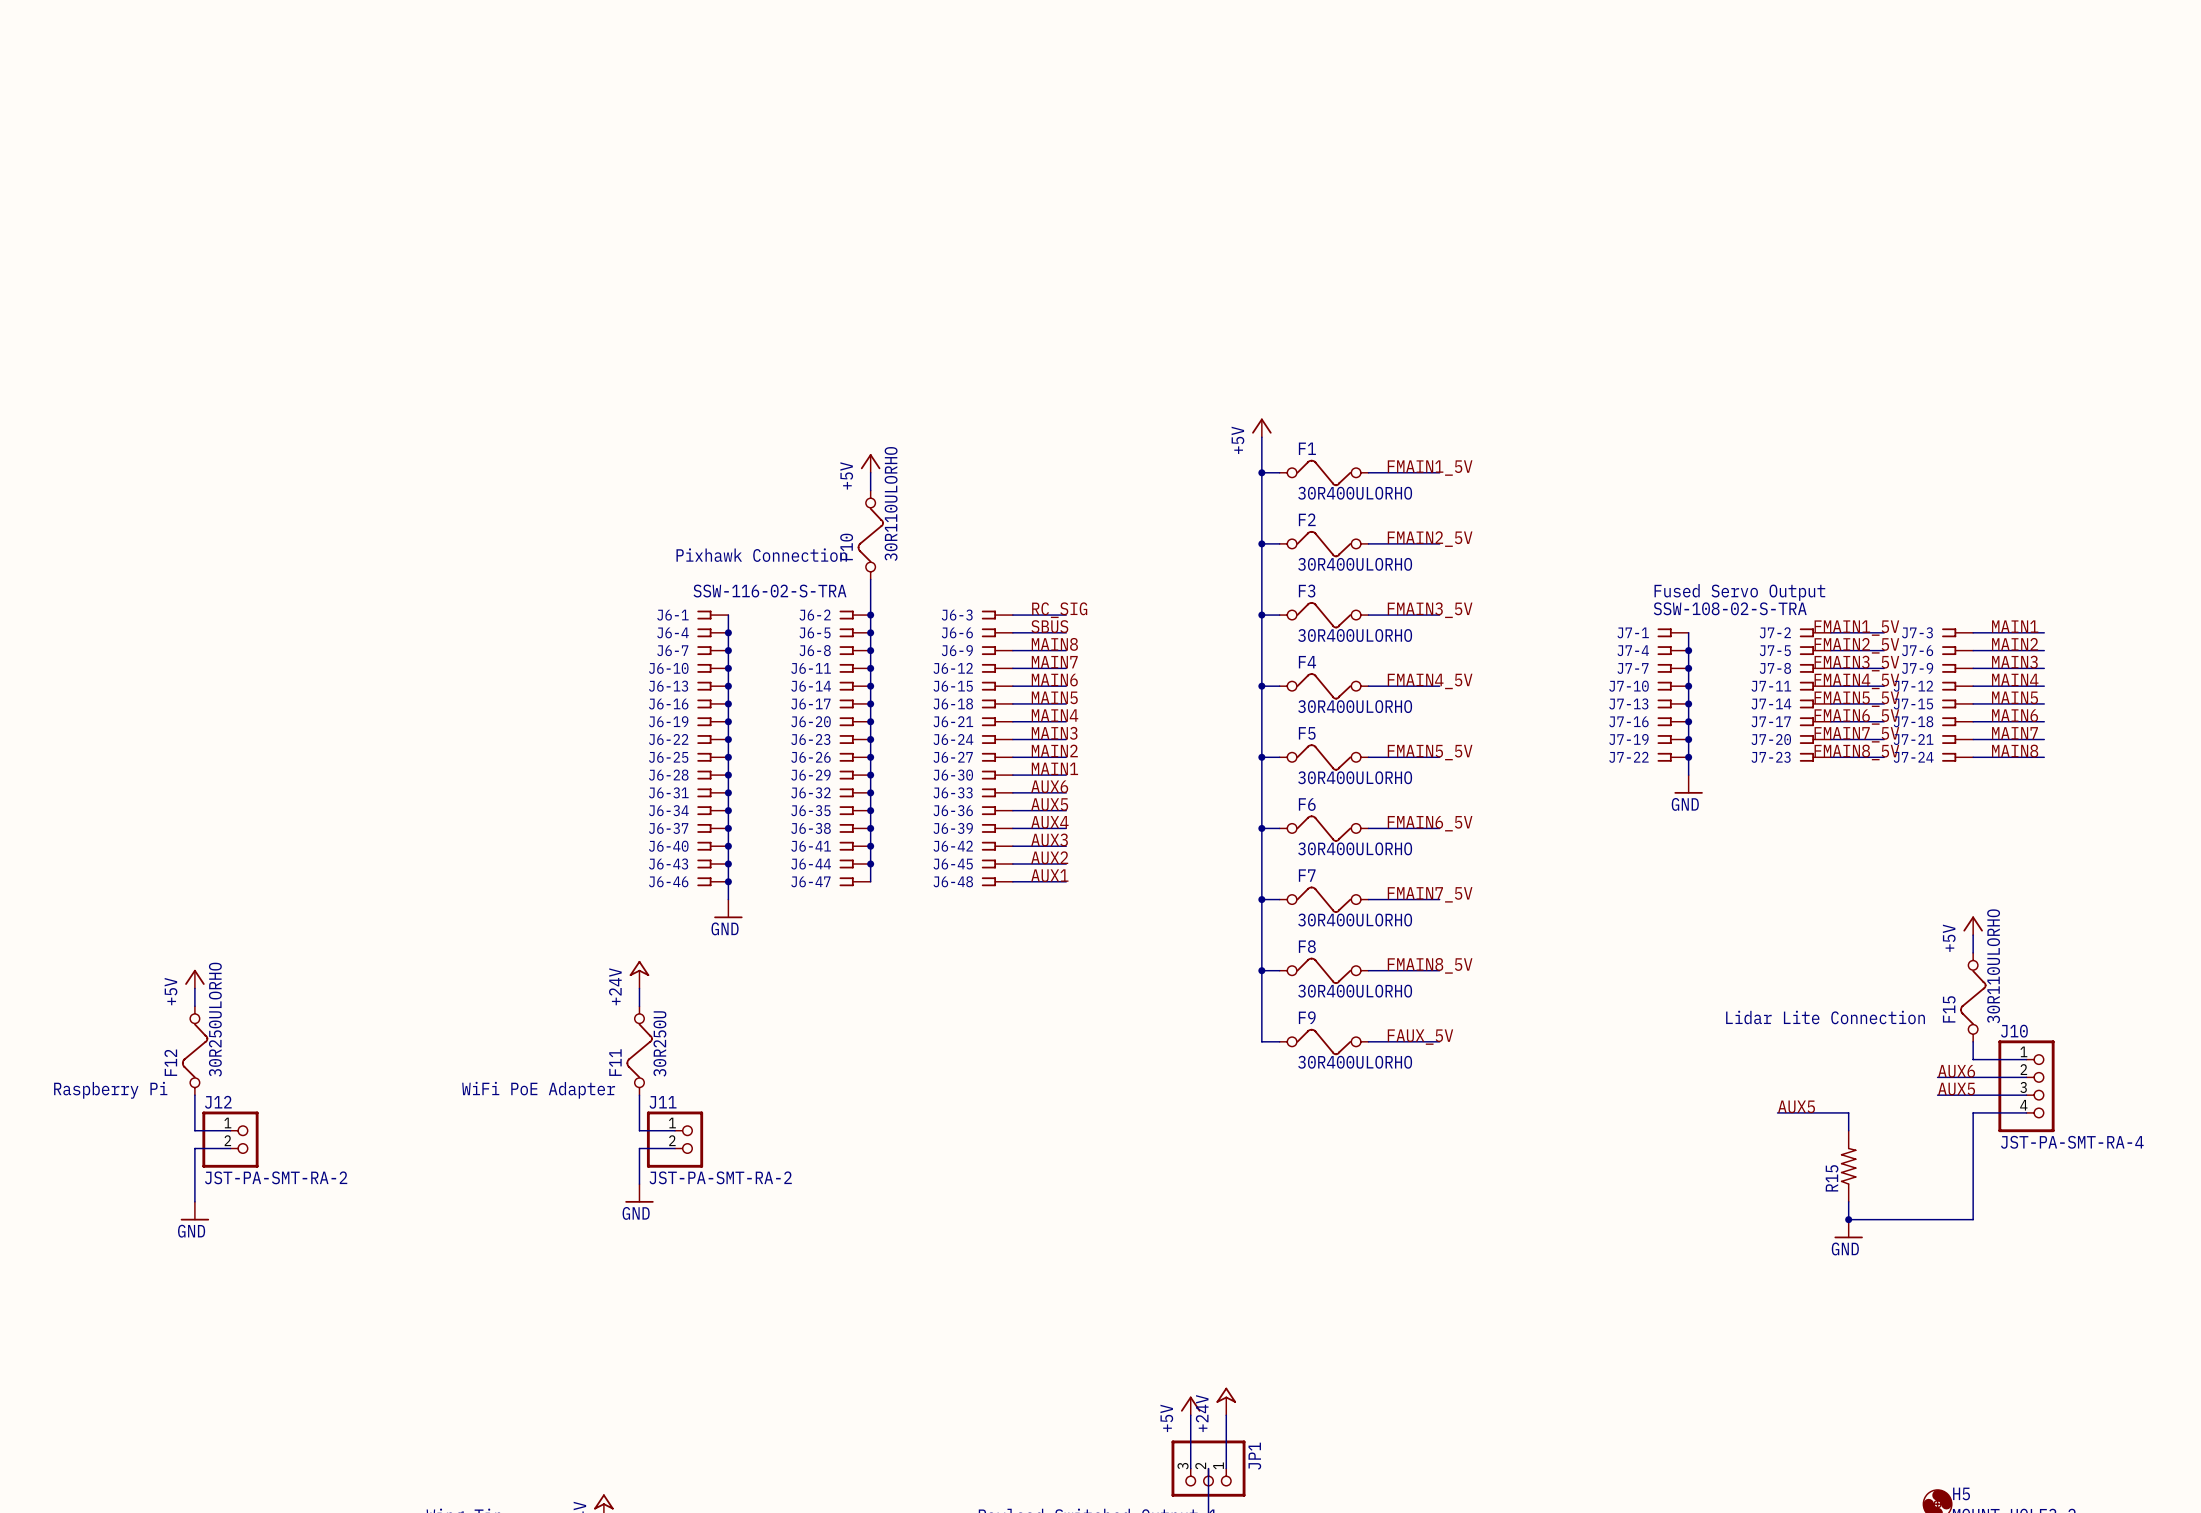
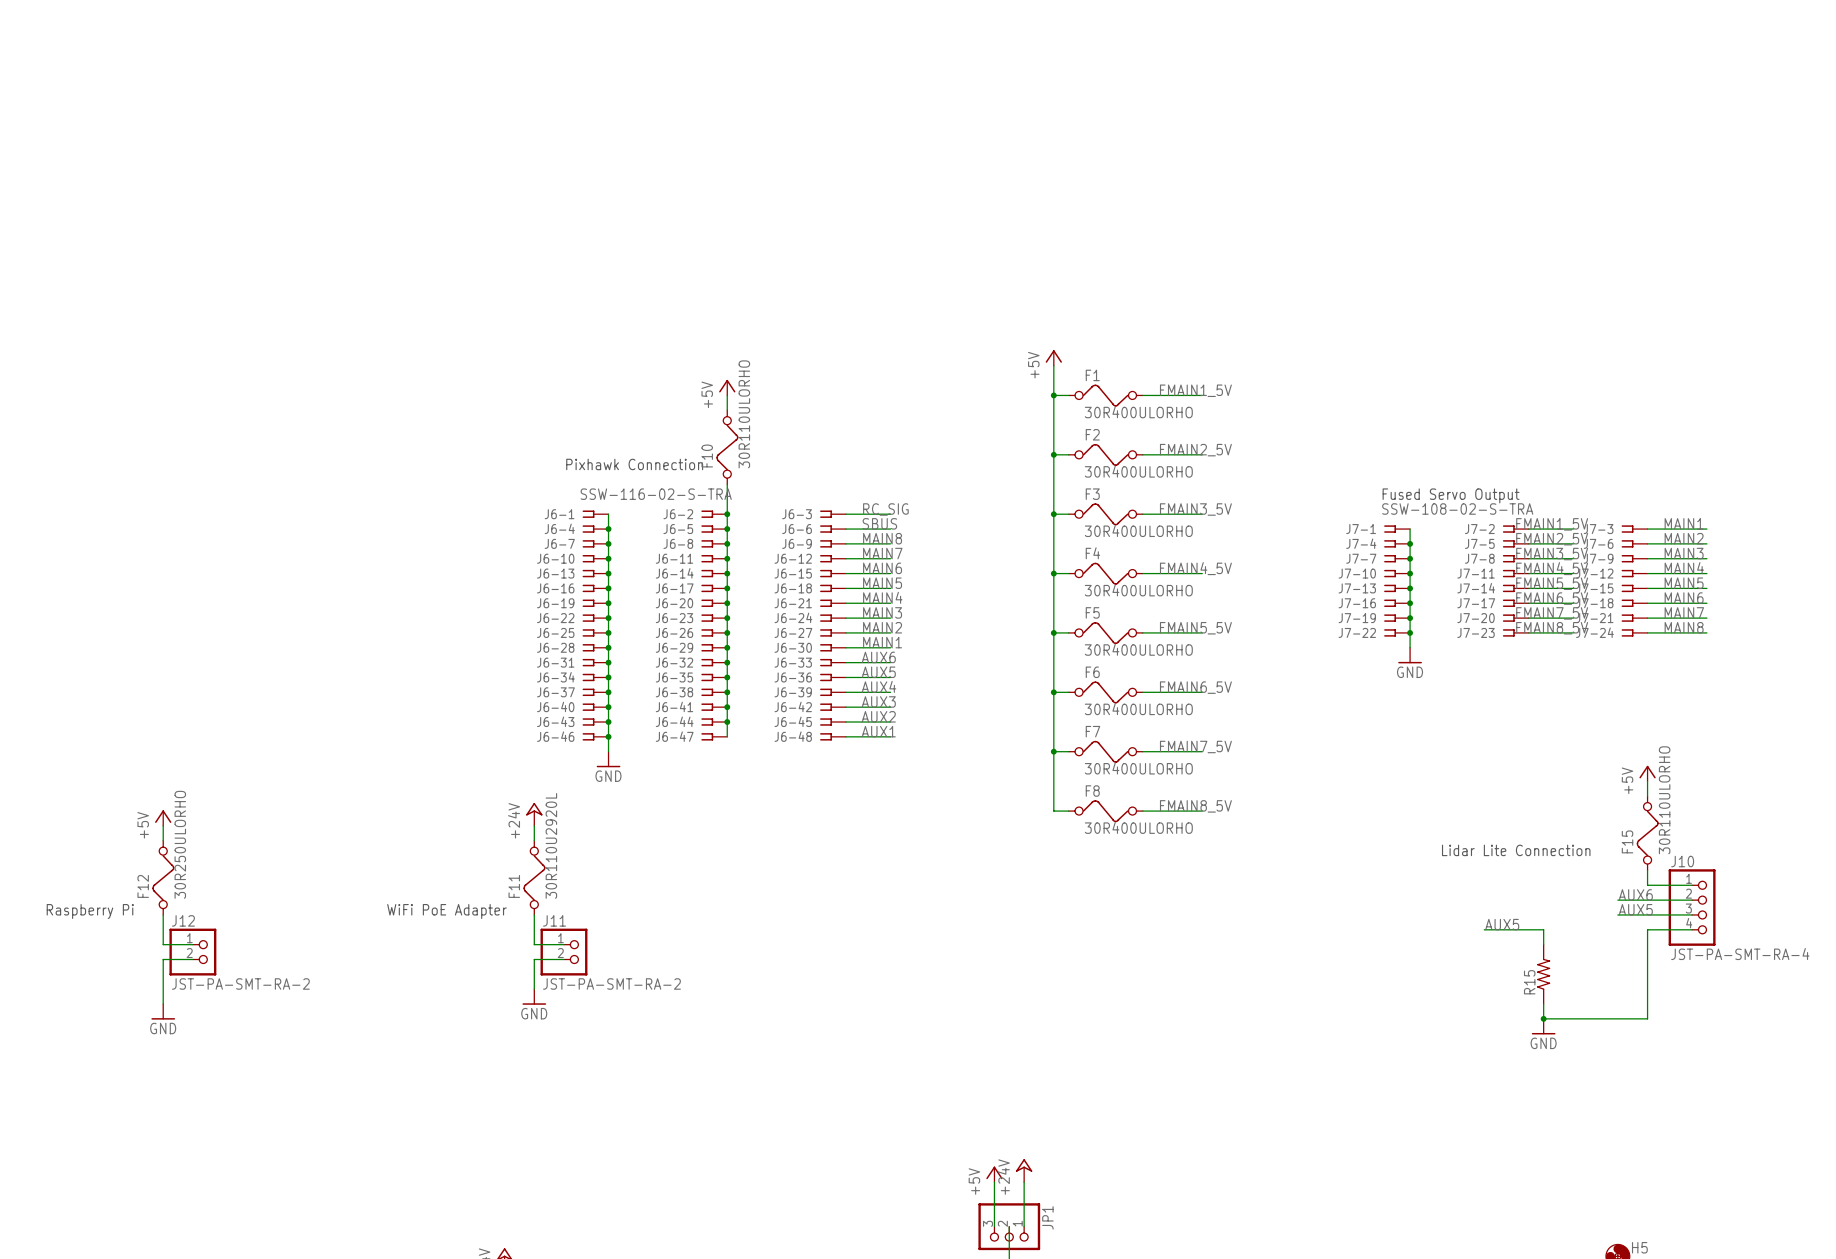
wire: (1261, 970) (1261, 1041) (1279, 1041) -> none
junction: (1261, 970) -> none
label: FAUX_5V (1420, 1037) -> none
wire: (1368, 1041) (1439, 1041) -> none
F9: 30R400ULORHO (1324, 1042) -> none
F11 value: 30R250U (659, 1043) -> 30R110U2920L (551, 845)

